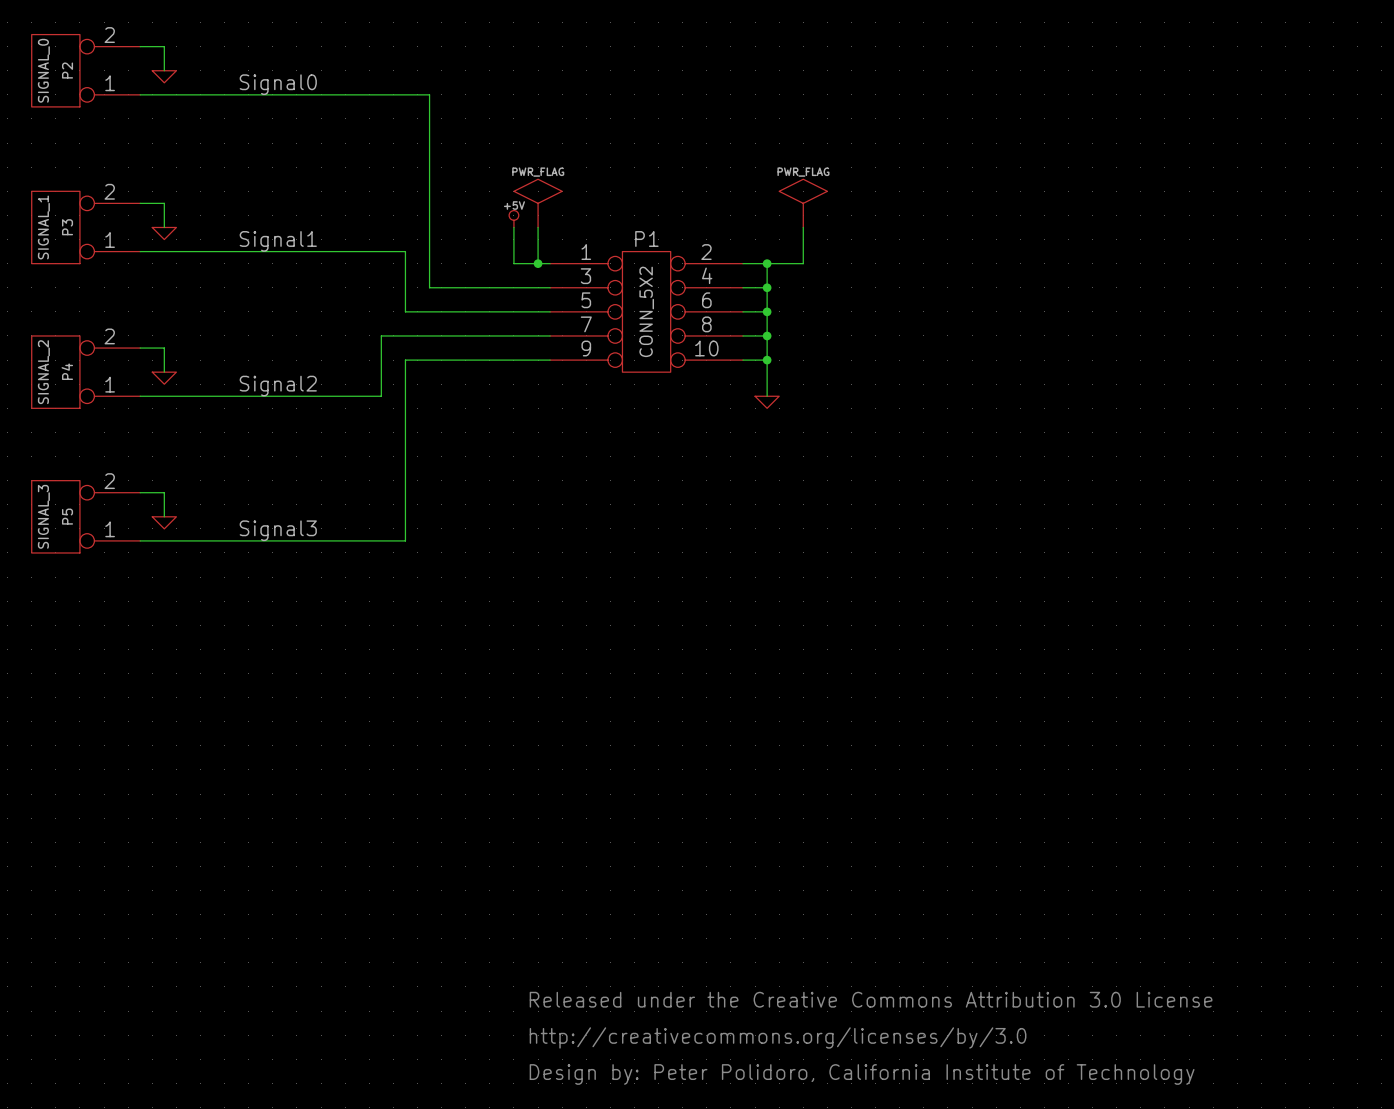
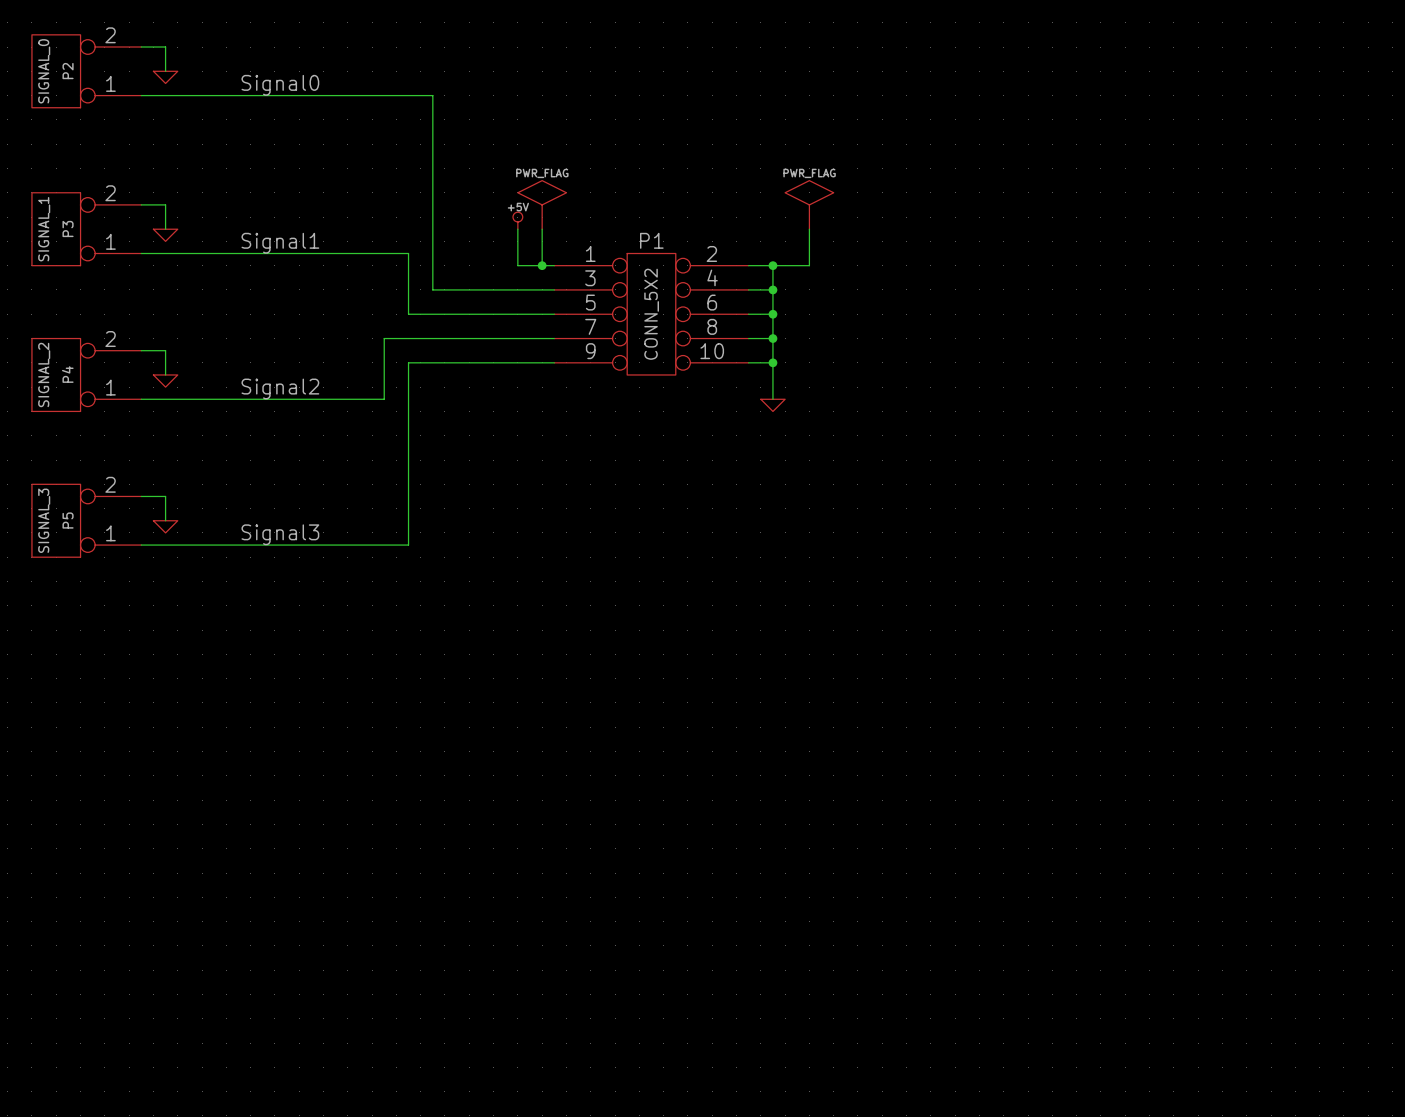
text: Released under the Creative Commons Attribution 3.0 License (871, 999) -> none
text: http://creativecommons.org/licenses/by/3.0 (778, 1037) -> none
text: Design by: Peter Polidoro, California Institute of Technology (862, 1074) -> none

